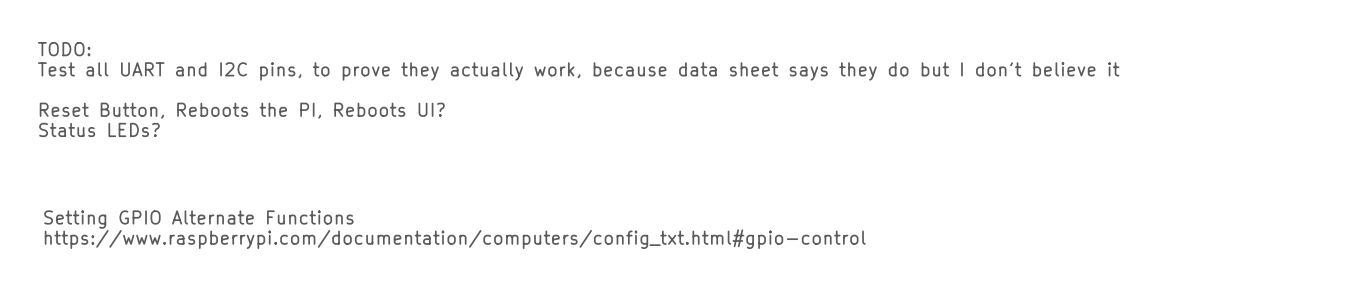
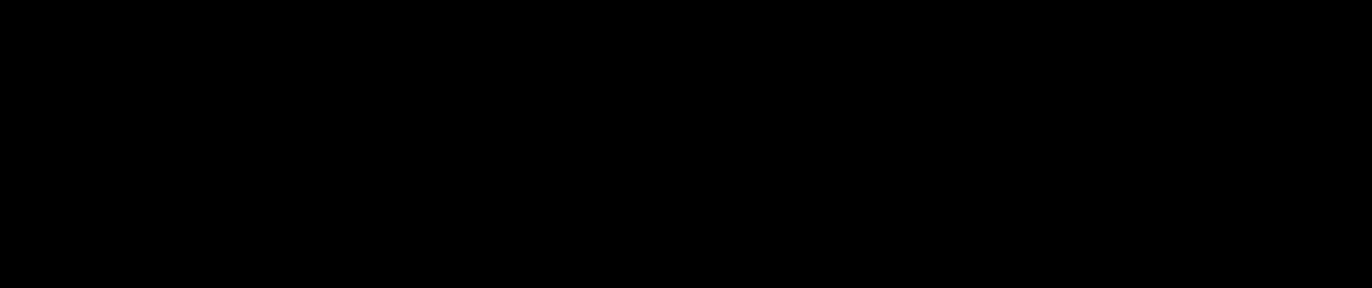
text: TODO: (64, 49) -> none
text: Test all UART and I2C pins, to prove they actually work, because data sheet says they do but I don't believe it (578, 71) -> none
text: Reset Button, Reboots the PI, Reboots UI? (242, 110) -> none
text: Status LEDs? (99, 129) -> none
text: Setting GPIO Alternate Functions (198, 219) -> none
text: https://www.raspberrypi.com/documentation/computers/config_txt.html#gpio-control (455, 239) -> none

